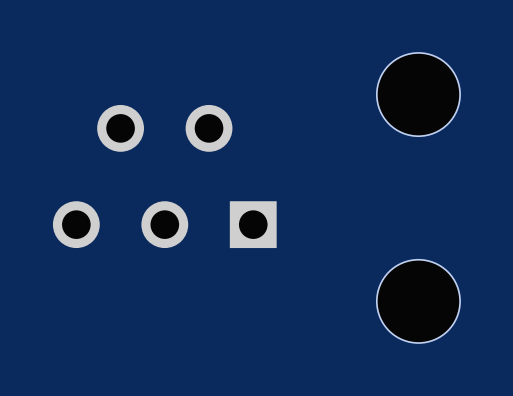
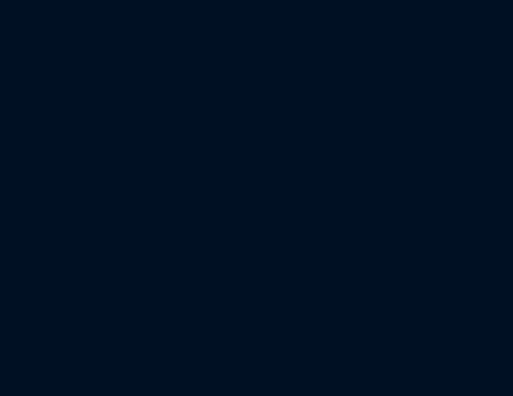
part: (418, 94) -> none
part: (164, 176) -> none
part: (418, 301) -> none

